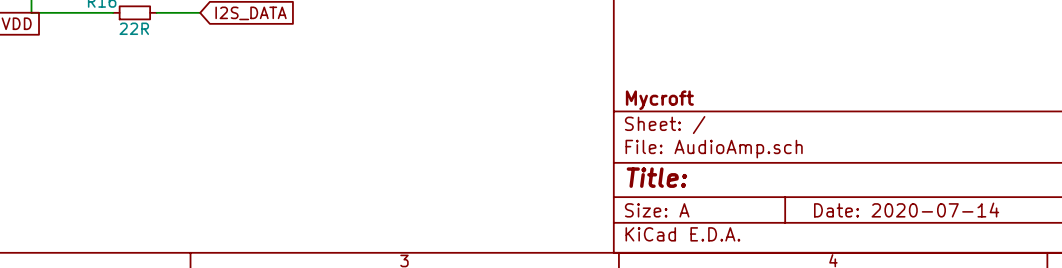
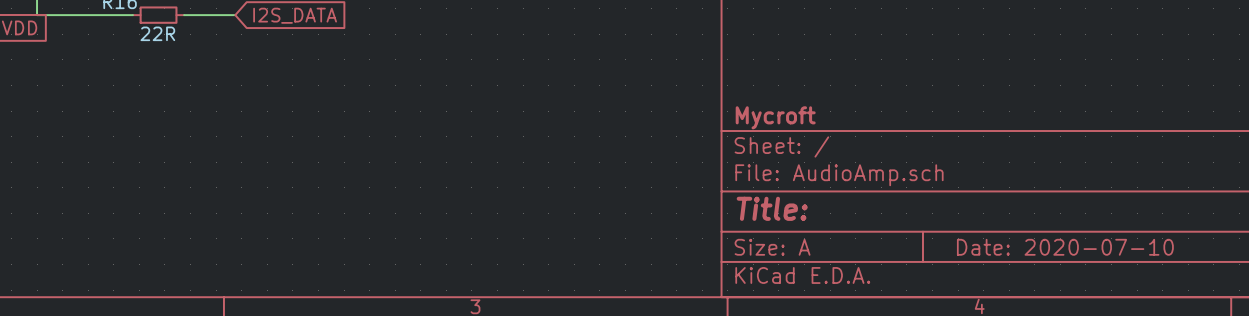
title block: Date: 2020-07-14 (906, 210) -> Date: 2020-07-10 (1065, 247)

